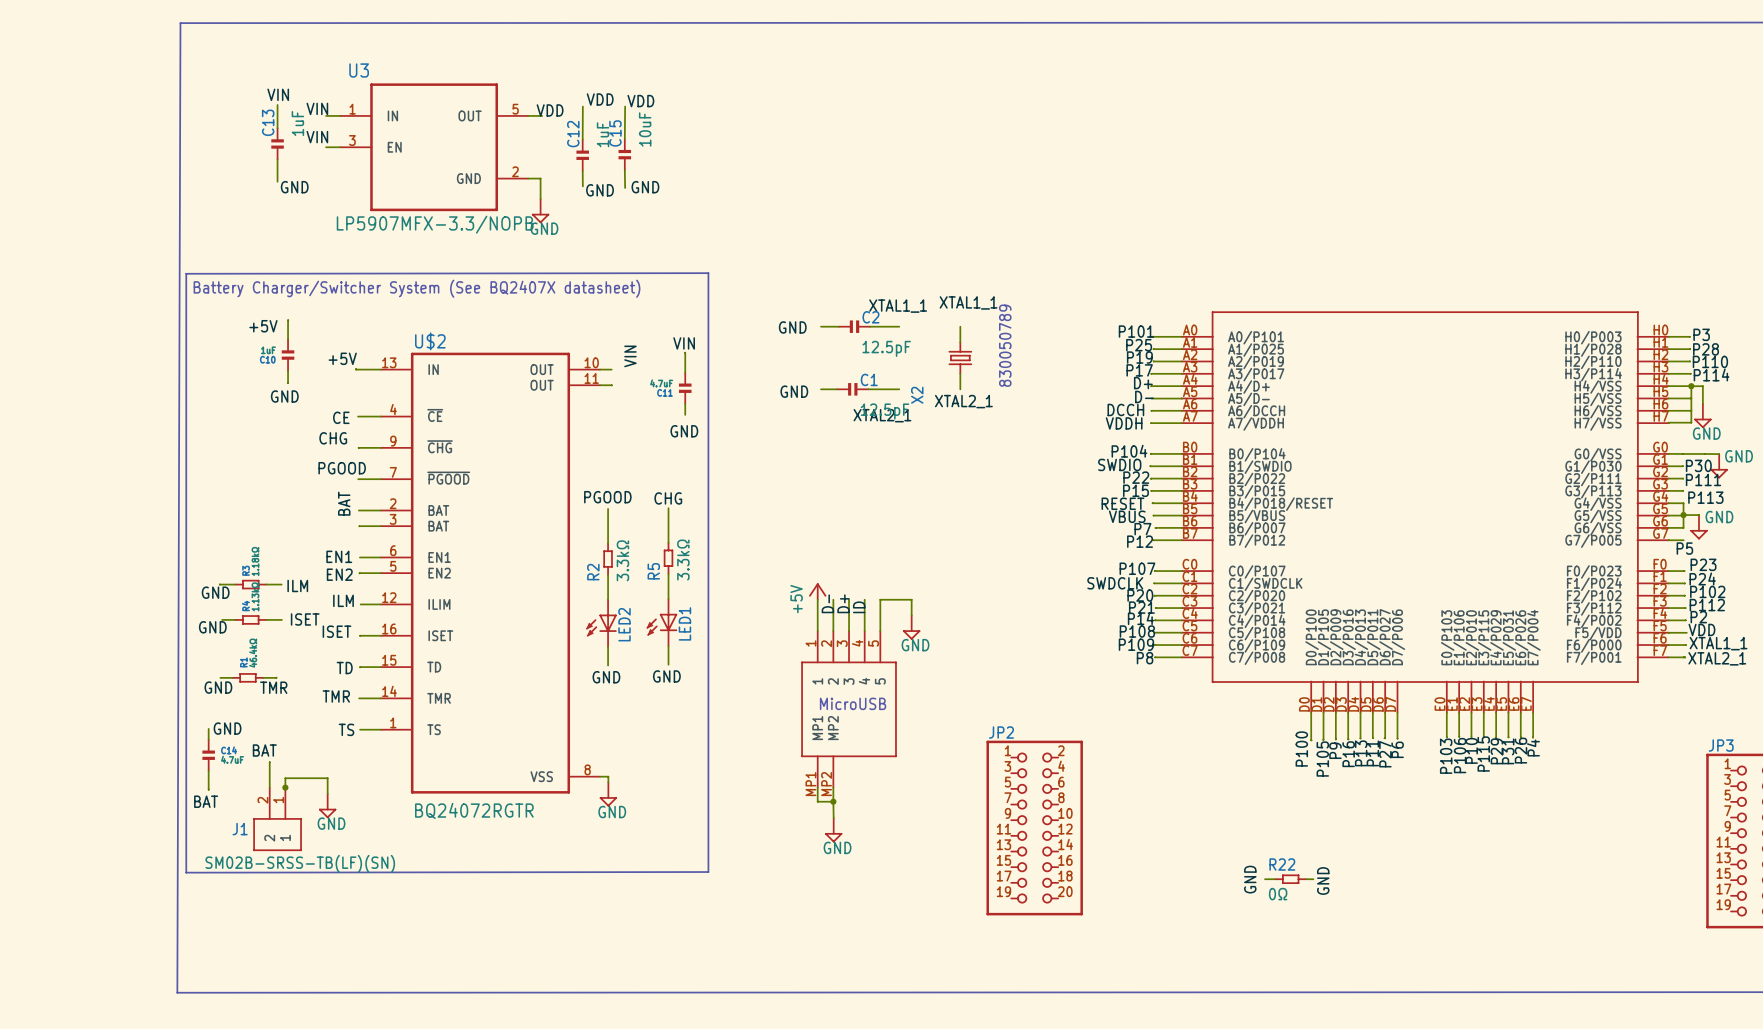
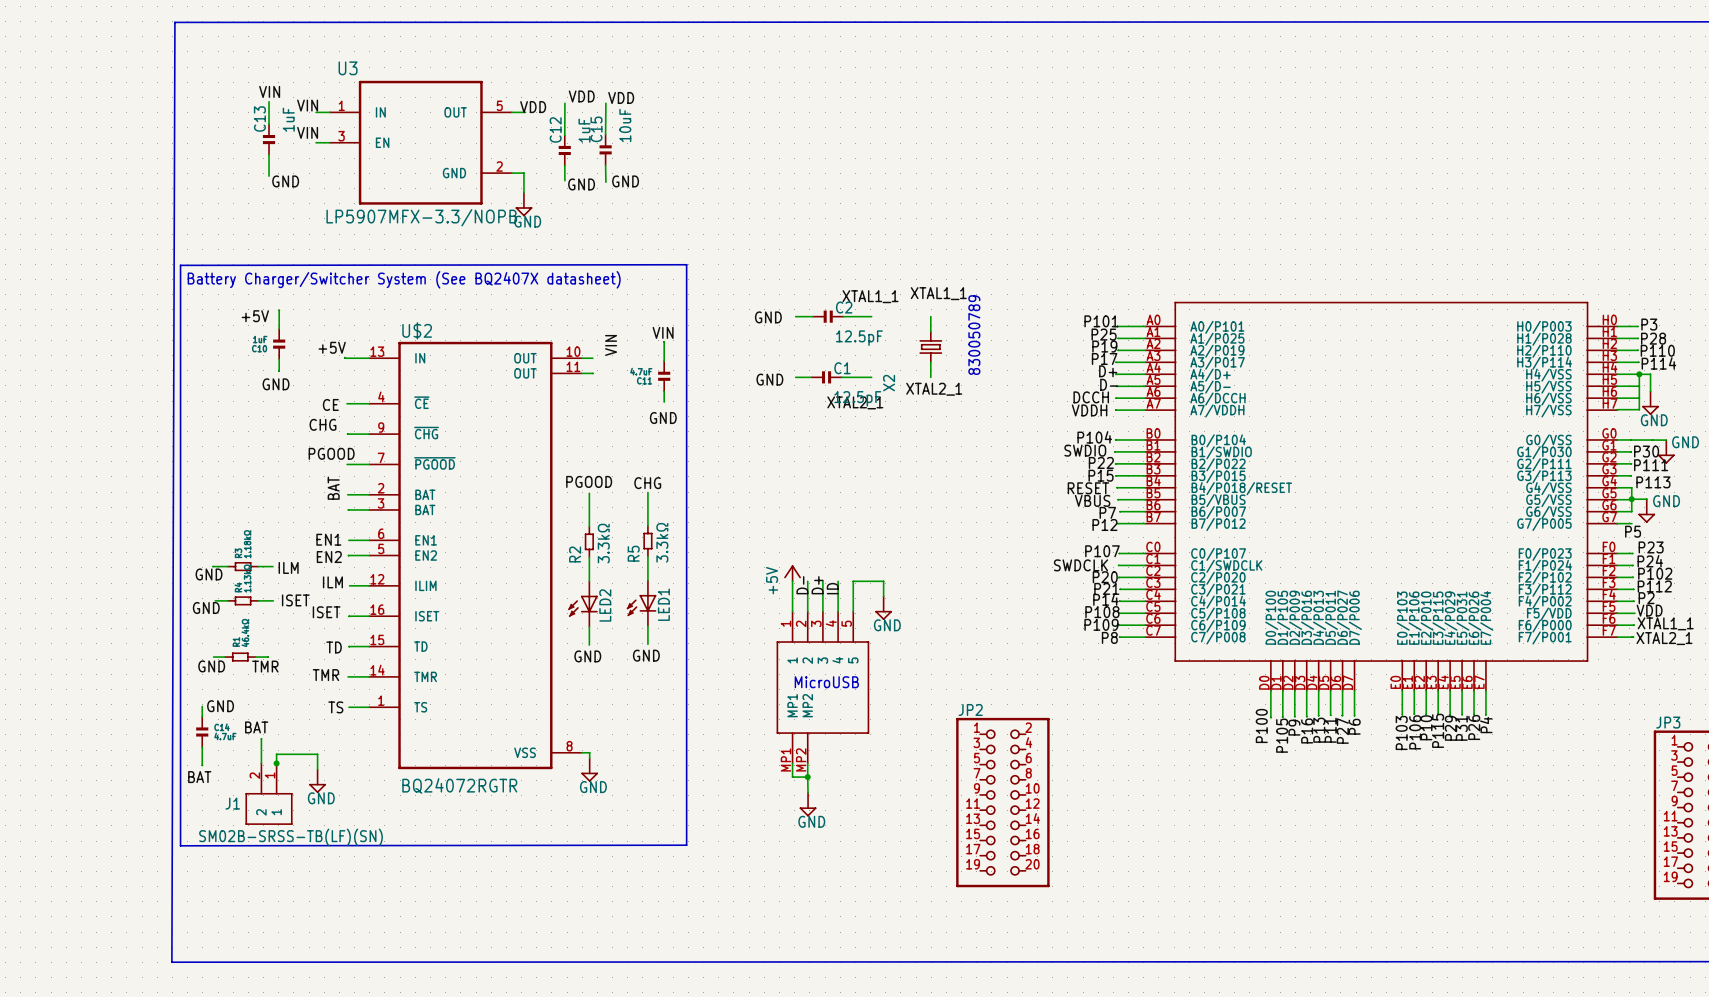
label: GND (1250, 879) -> none
wire: (1265, 879) (1275, 879) -> none
R22: 0Ω (1290, 879) -> none
wire: (1306, 879) (1313, 879) -> none
label: GND (1323, 880) -> none

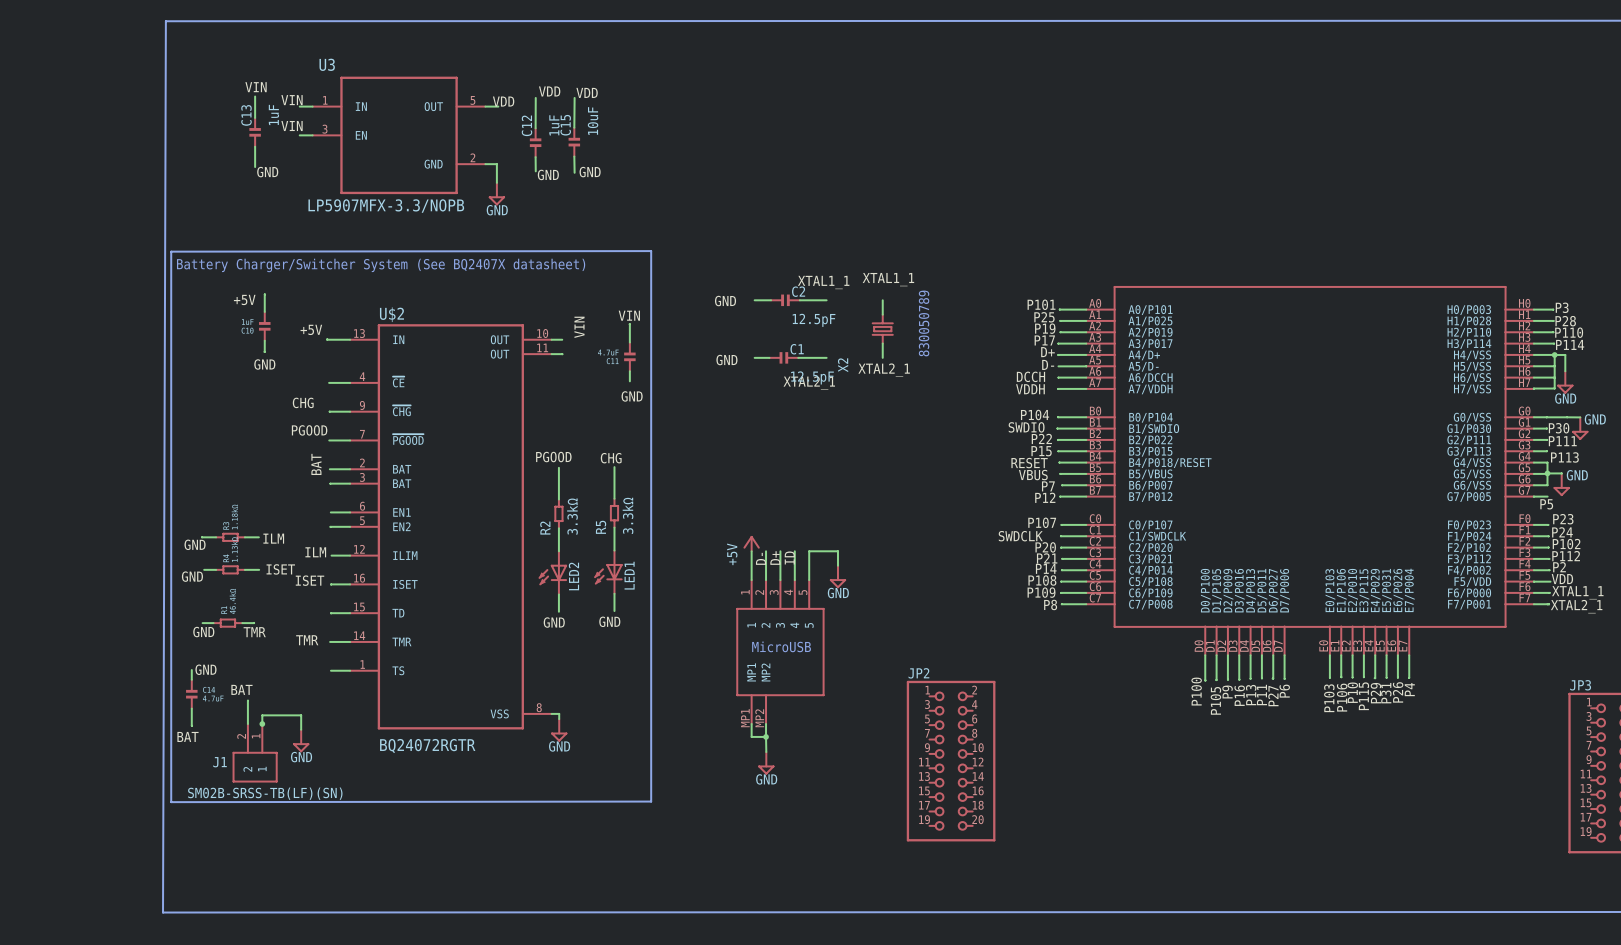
label: CE (330, 404) -> none
label: EN1 (328, 539) -> none
label: EN2 (329, 557) -> none
label: TD (334, 647) -> none
label: TS (335, 707) -> none

